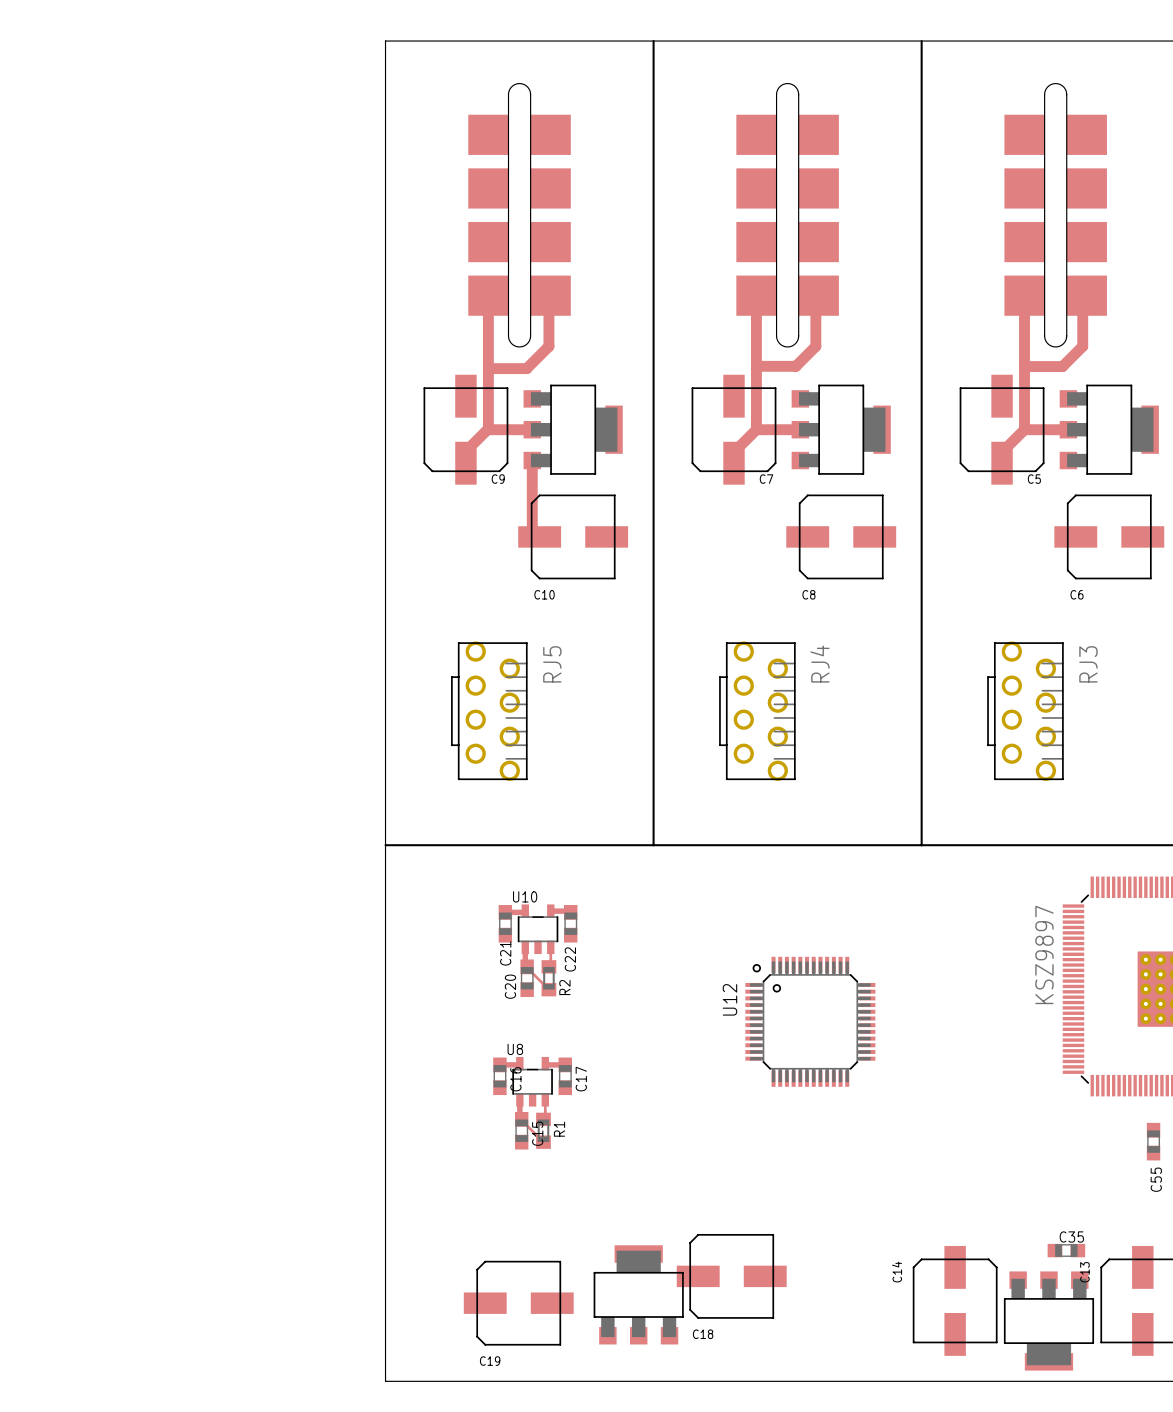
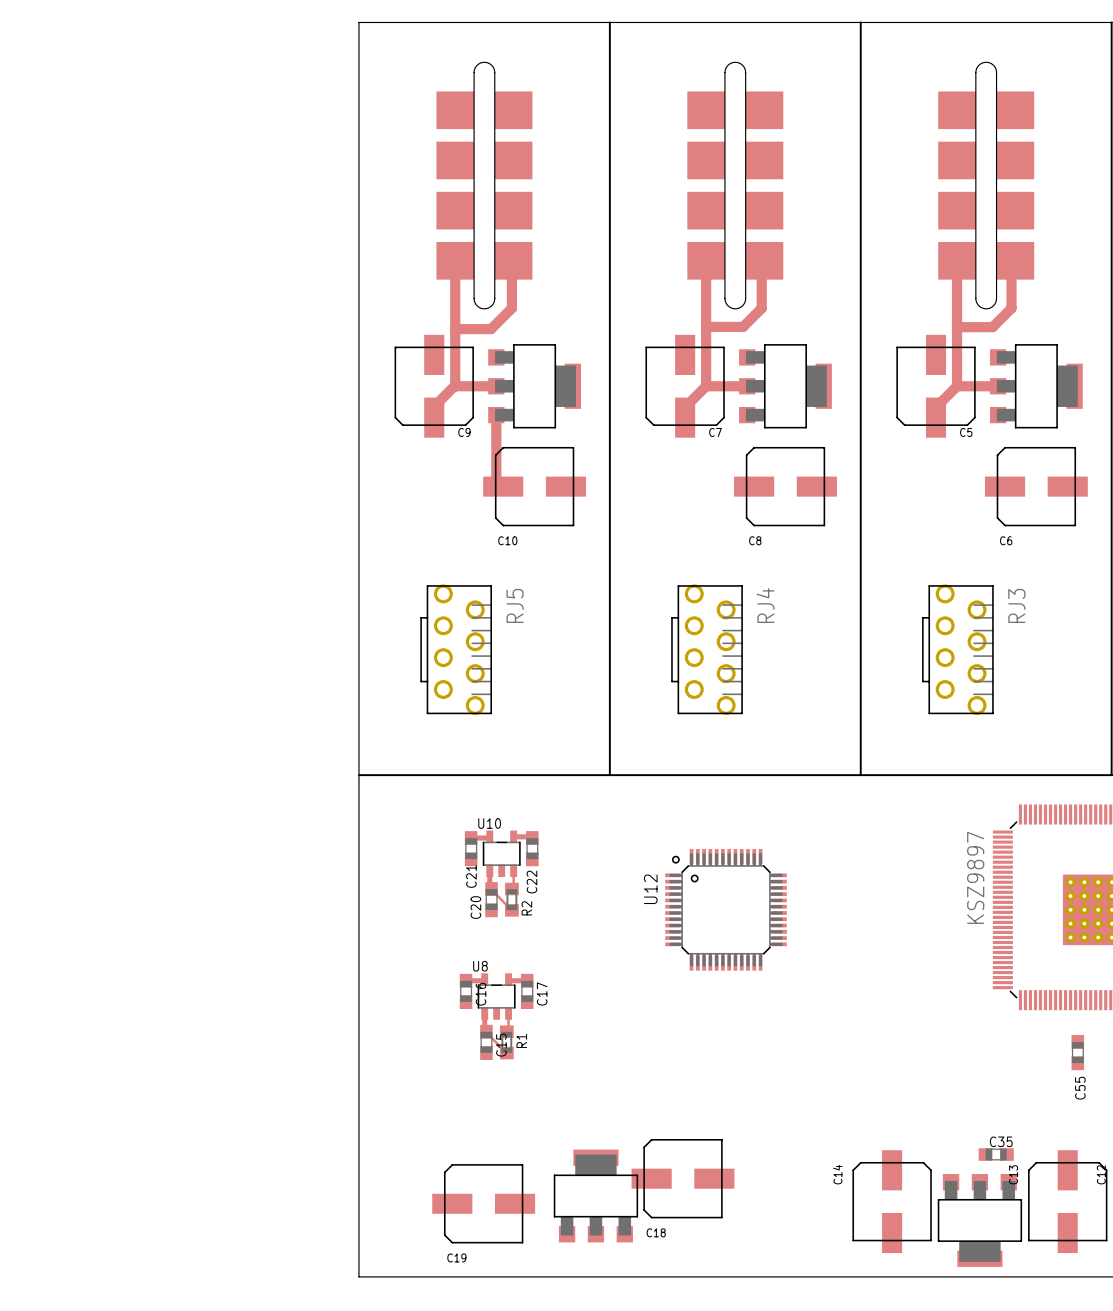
U12 position: (810, 1021) -> (726, 909)

